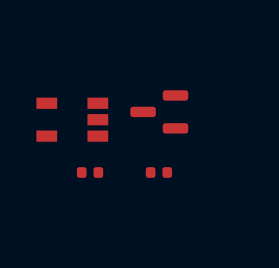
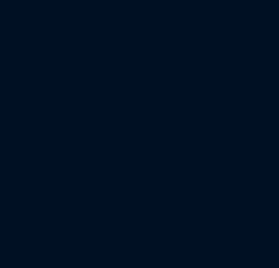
part: (159, 111) -> none
part: (72, 119) -> none
part: (90, 172) -> none
part: (158, 172) -> none

